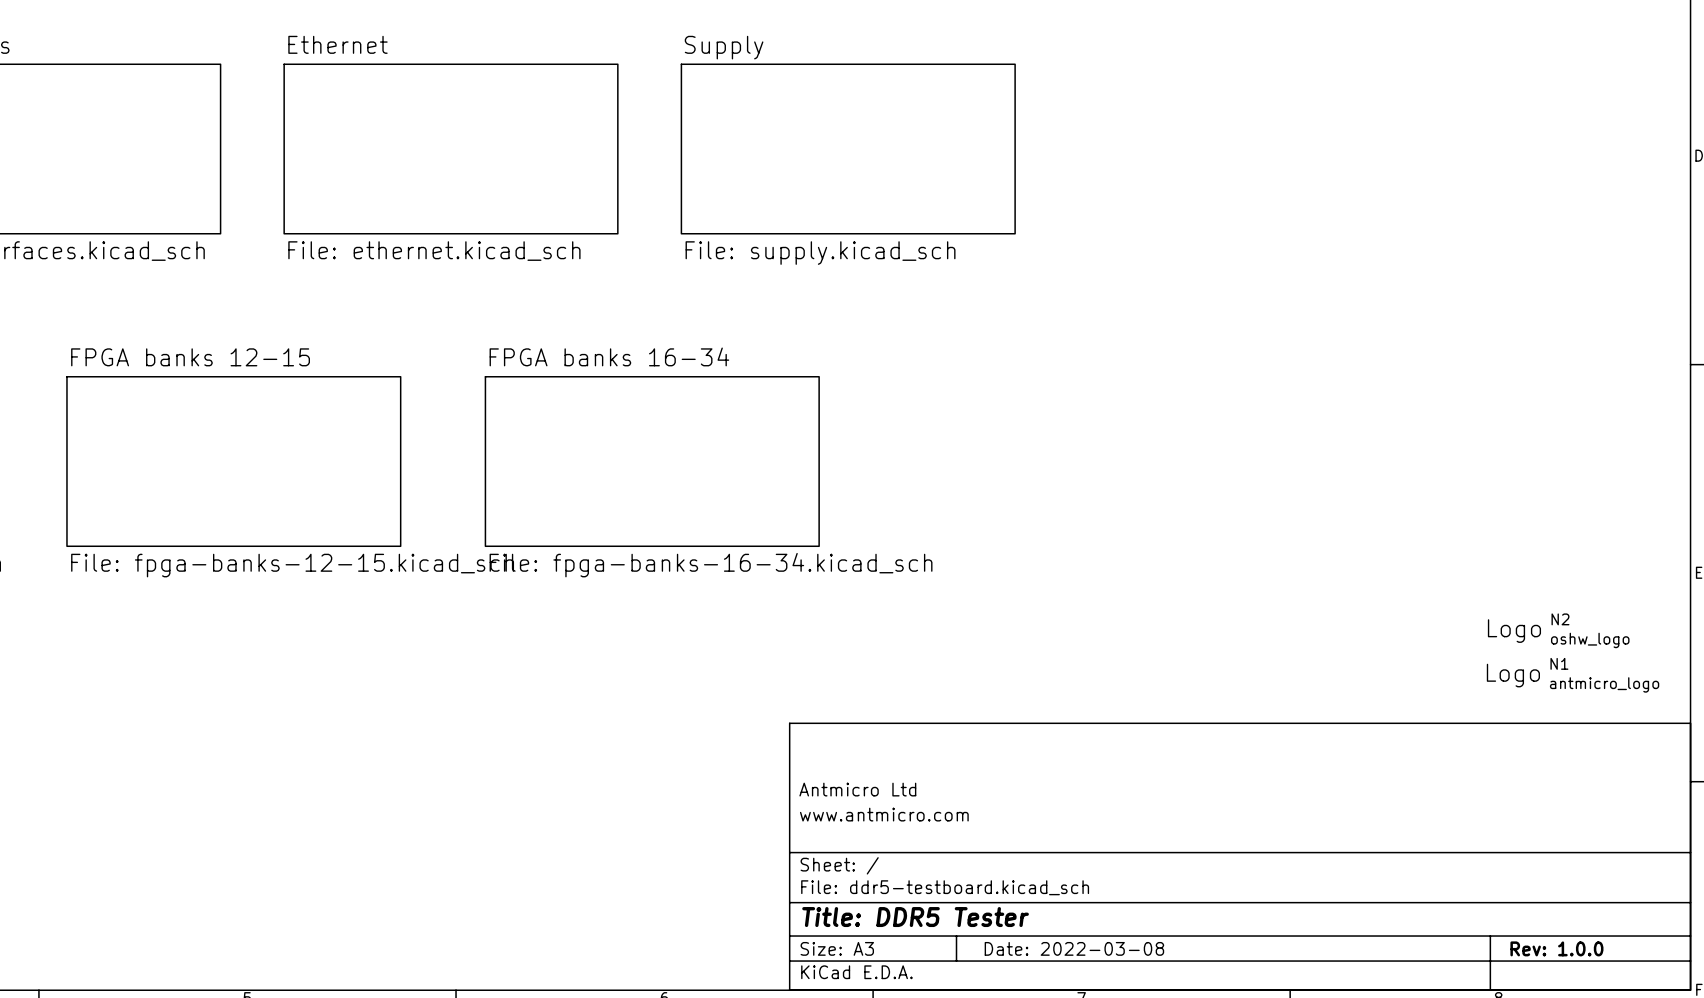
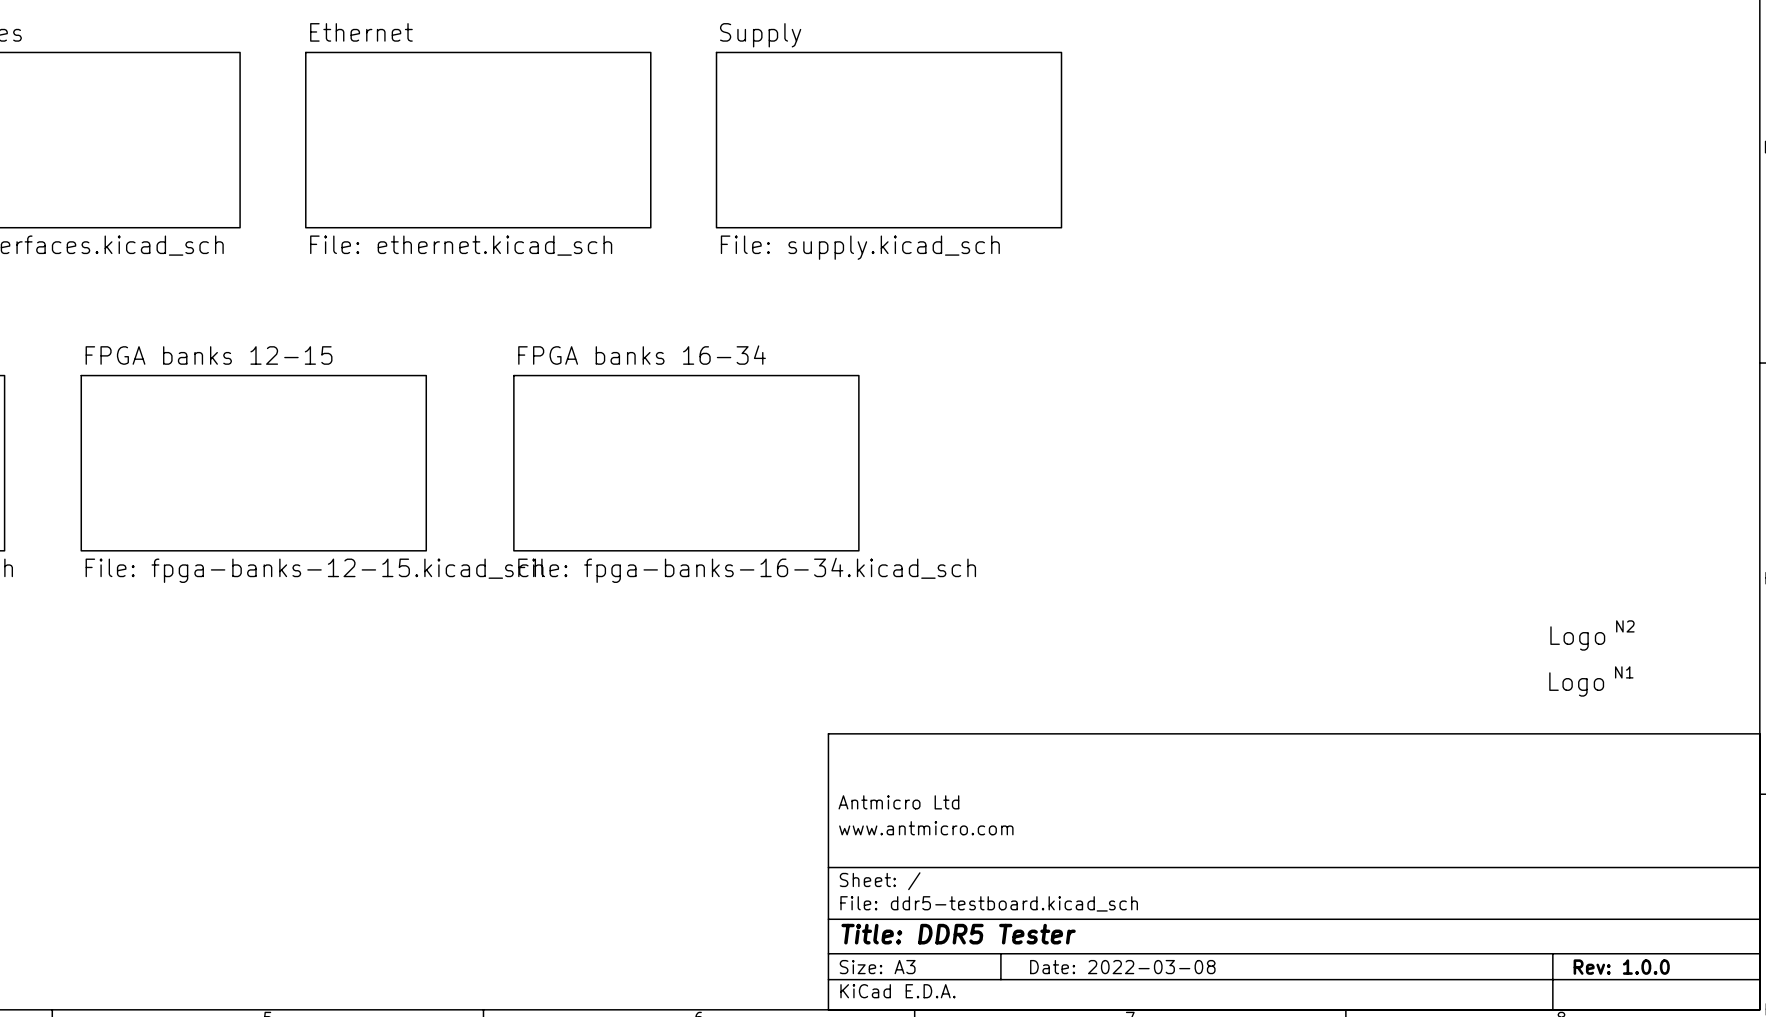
N2 value: oshw_logo (1590, 640) -> none
N1 value: antmicro_logo (1604, 684) -> none

